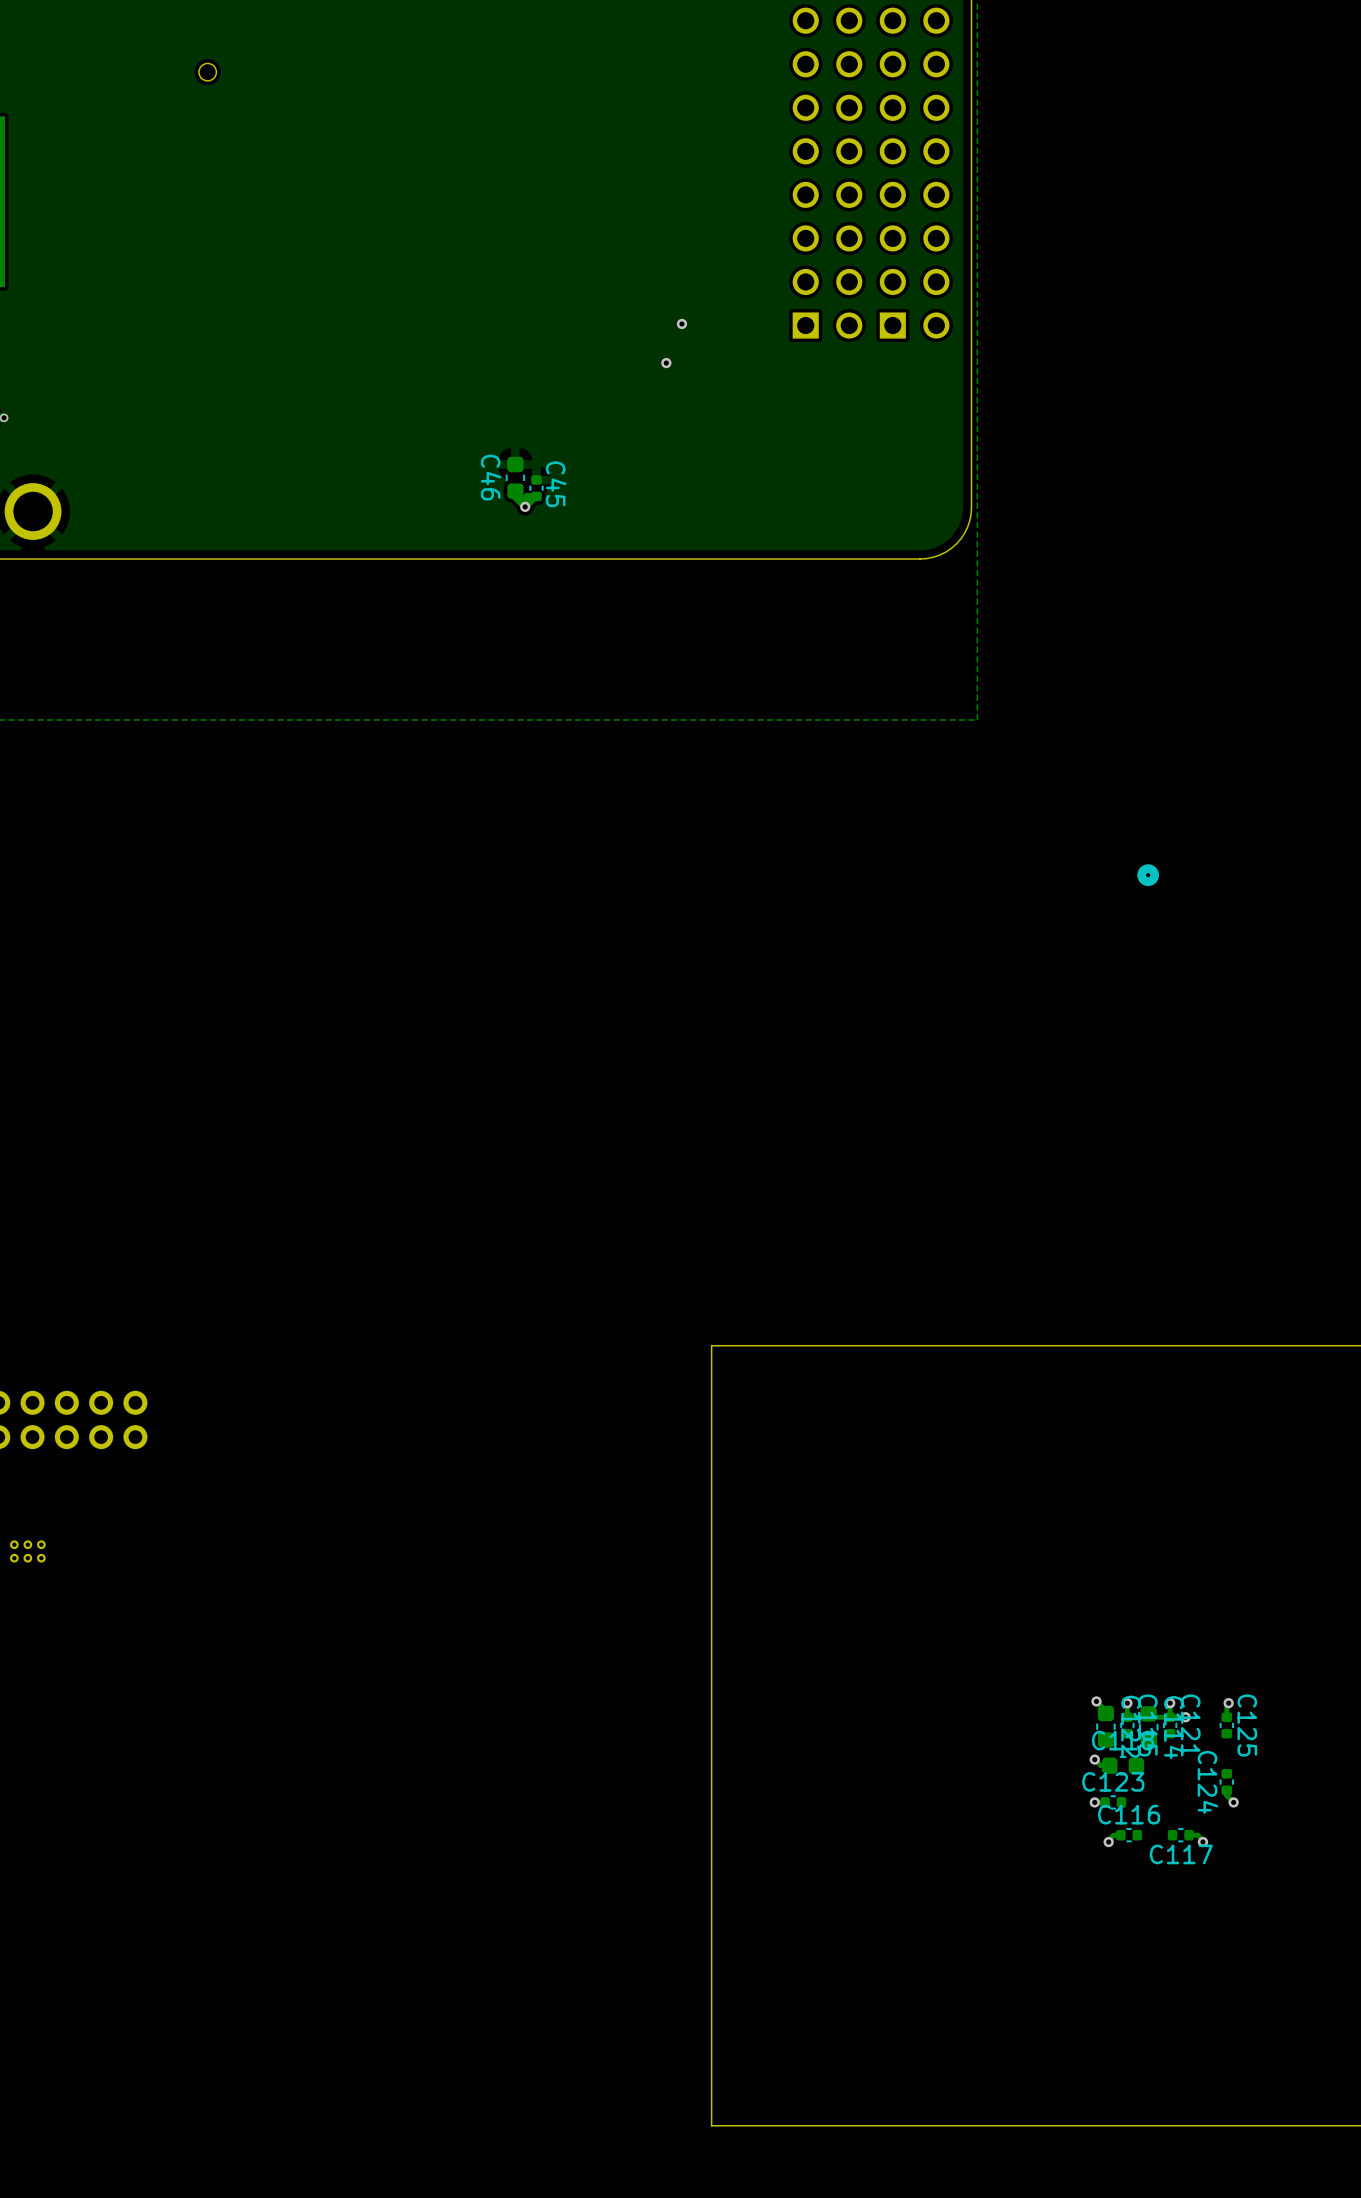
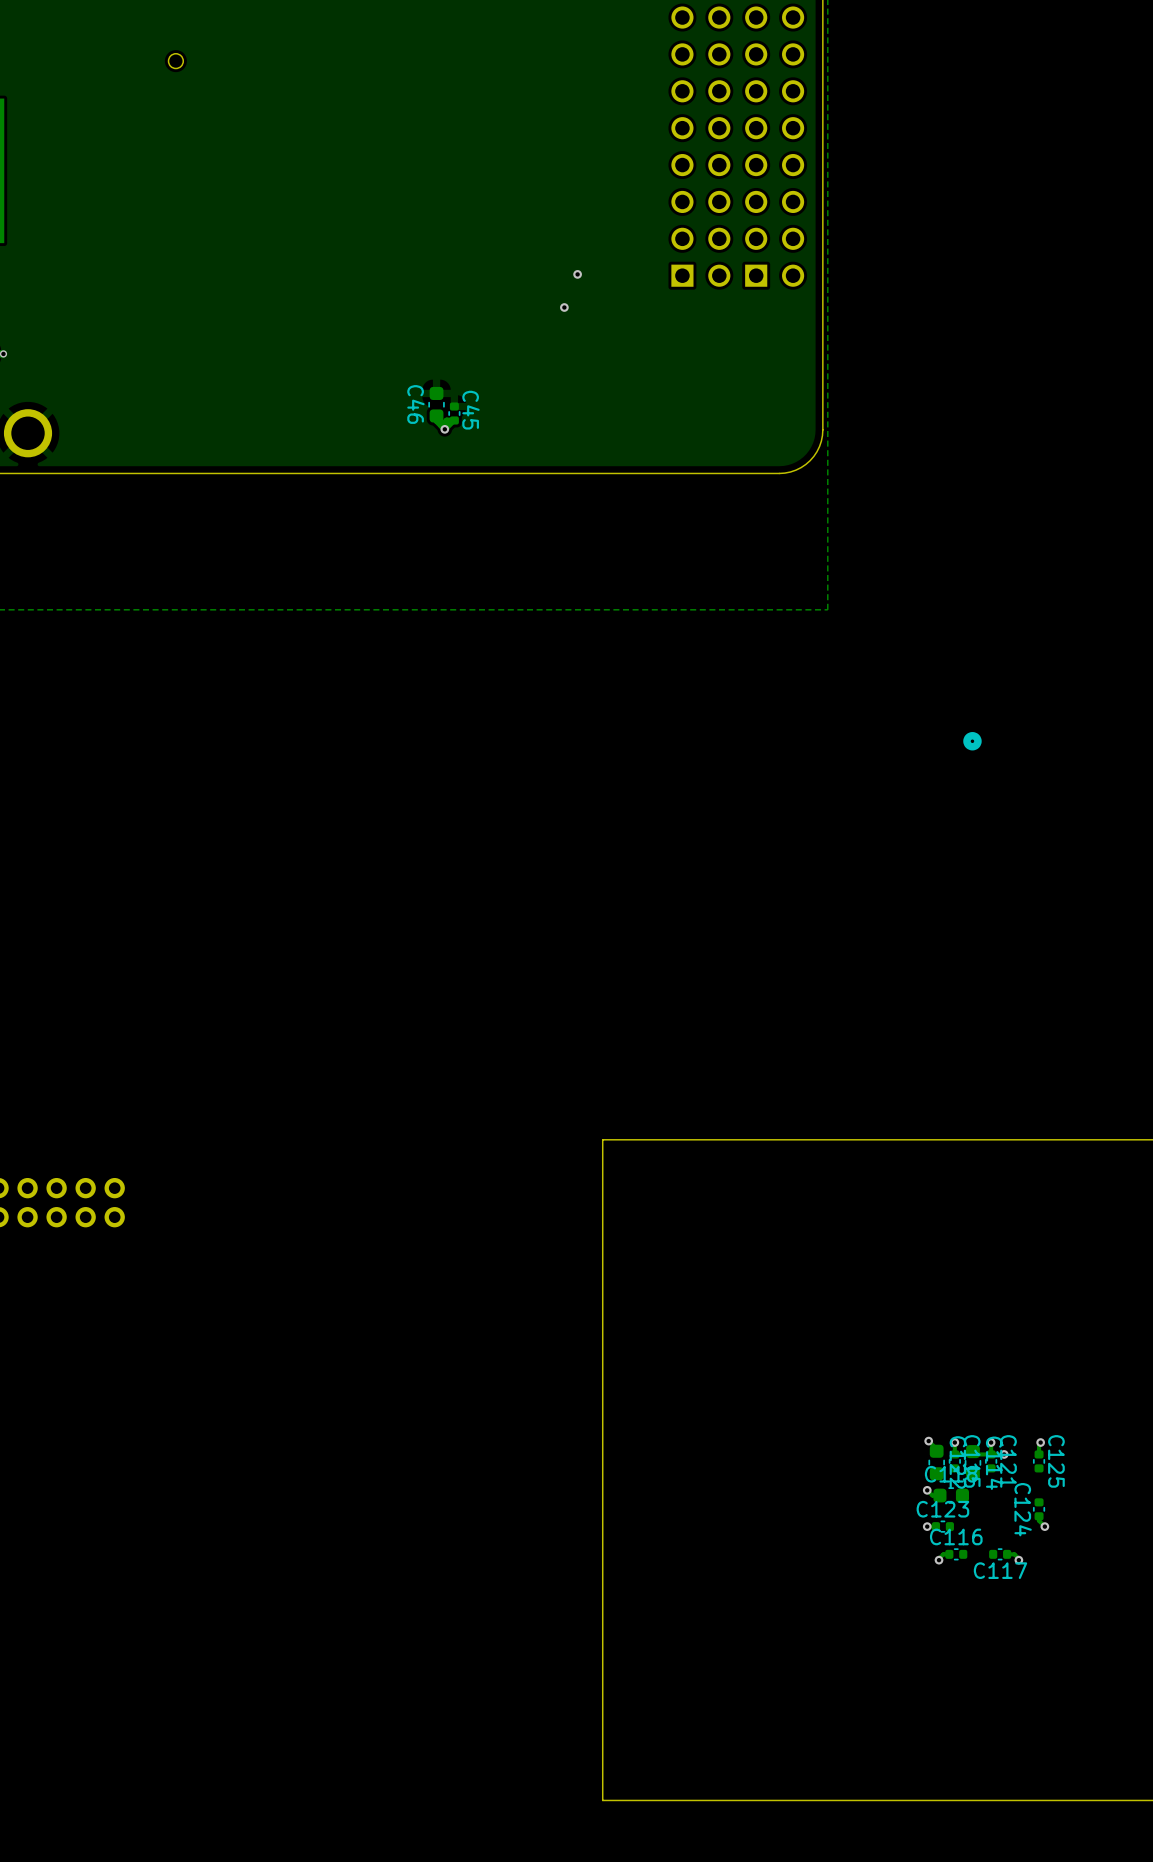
part: (27, 1551) -> none

